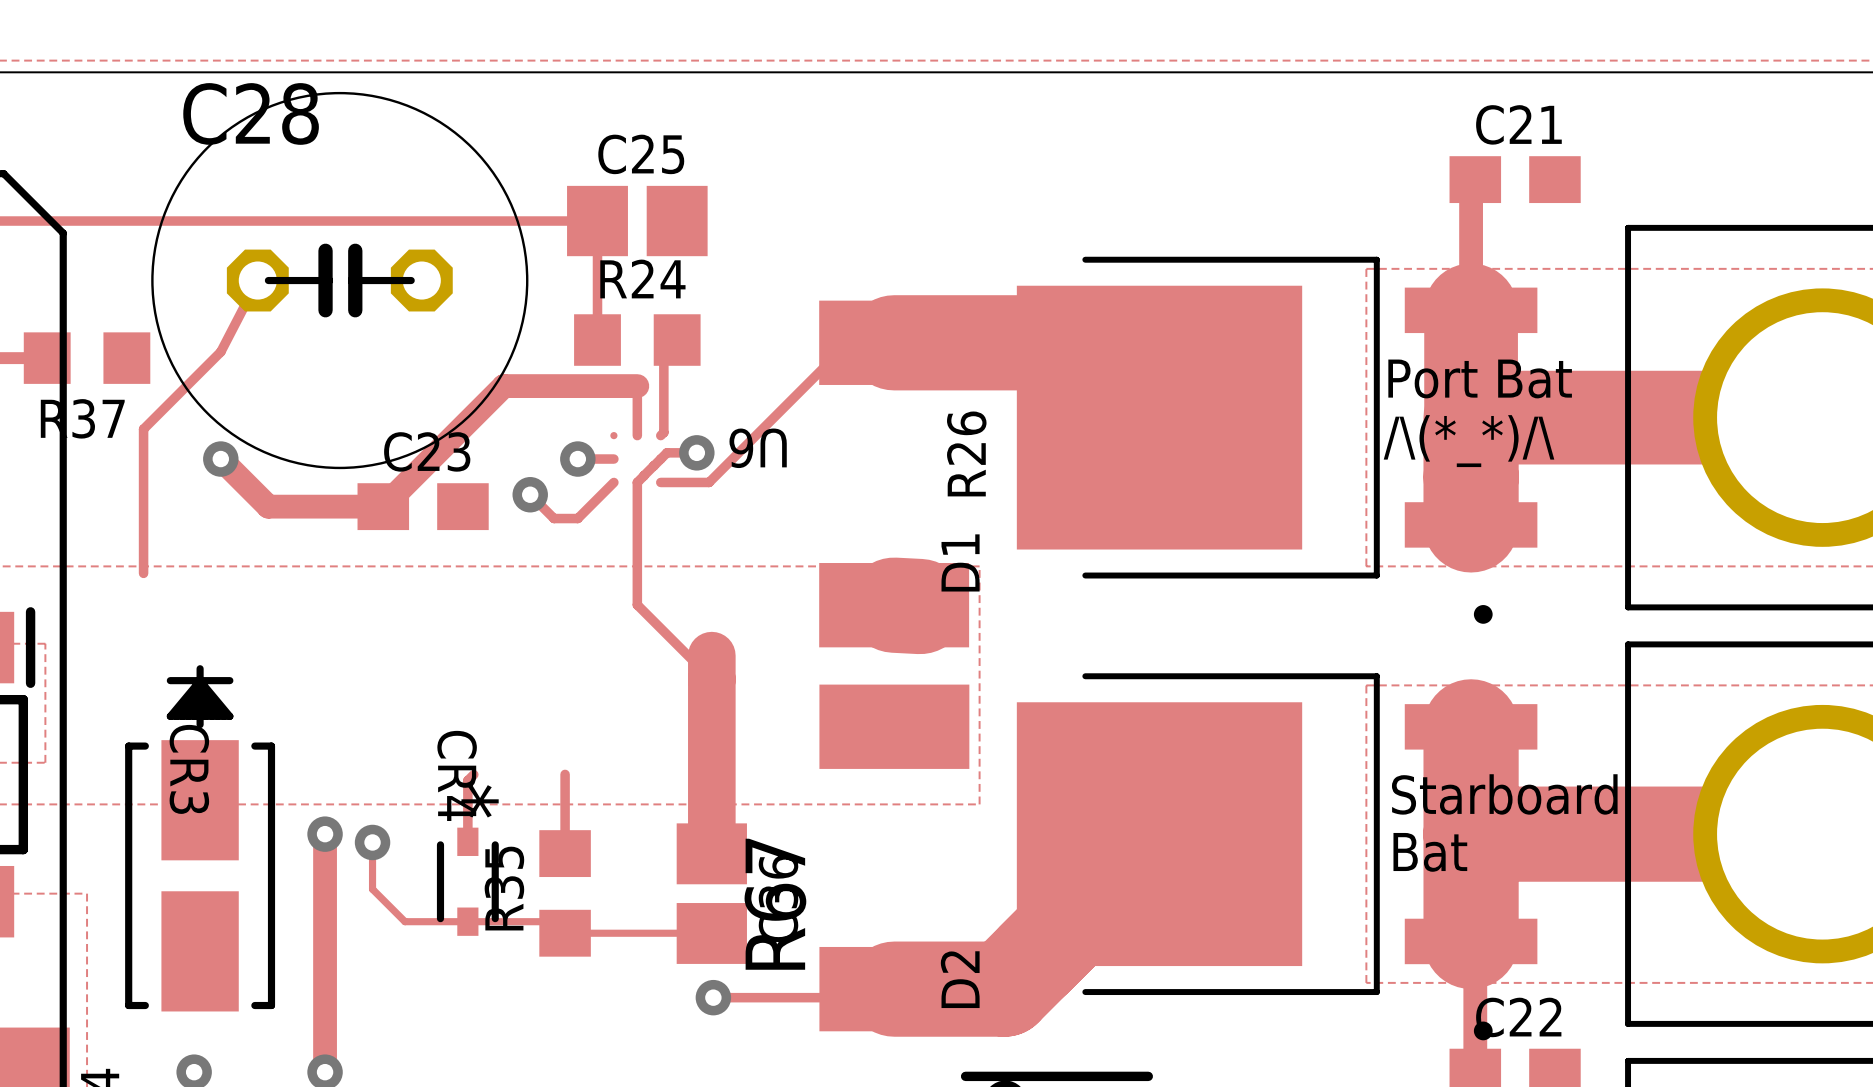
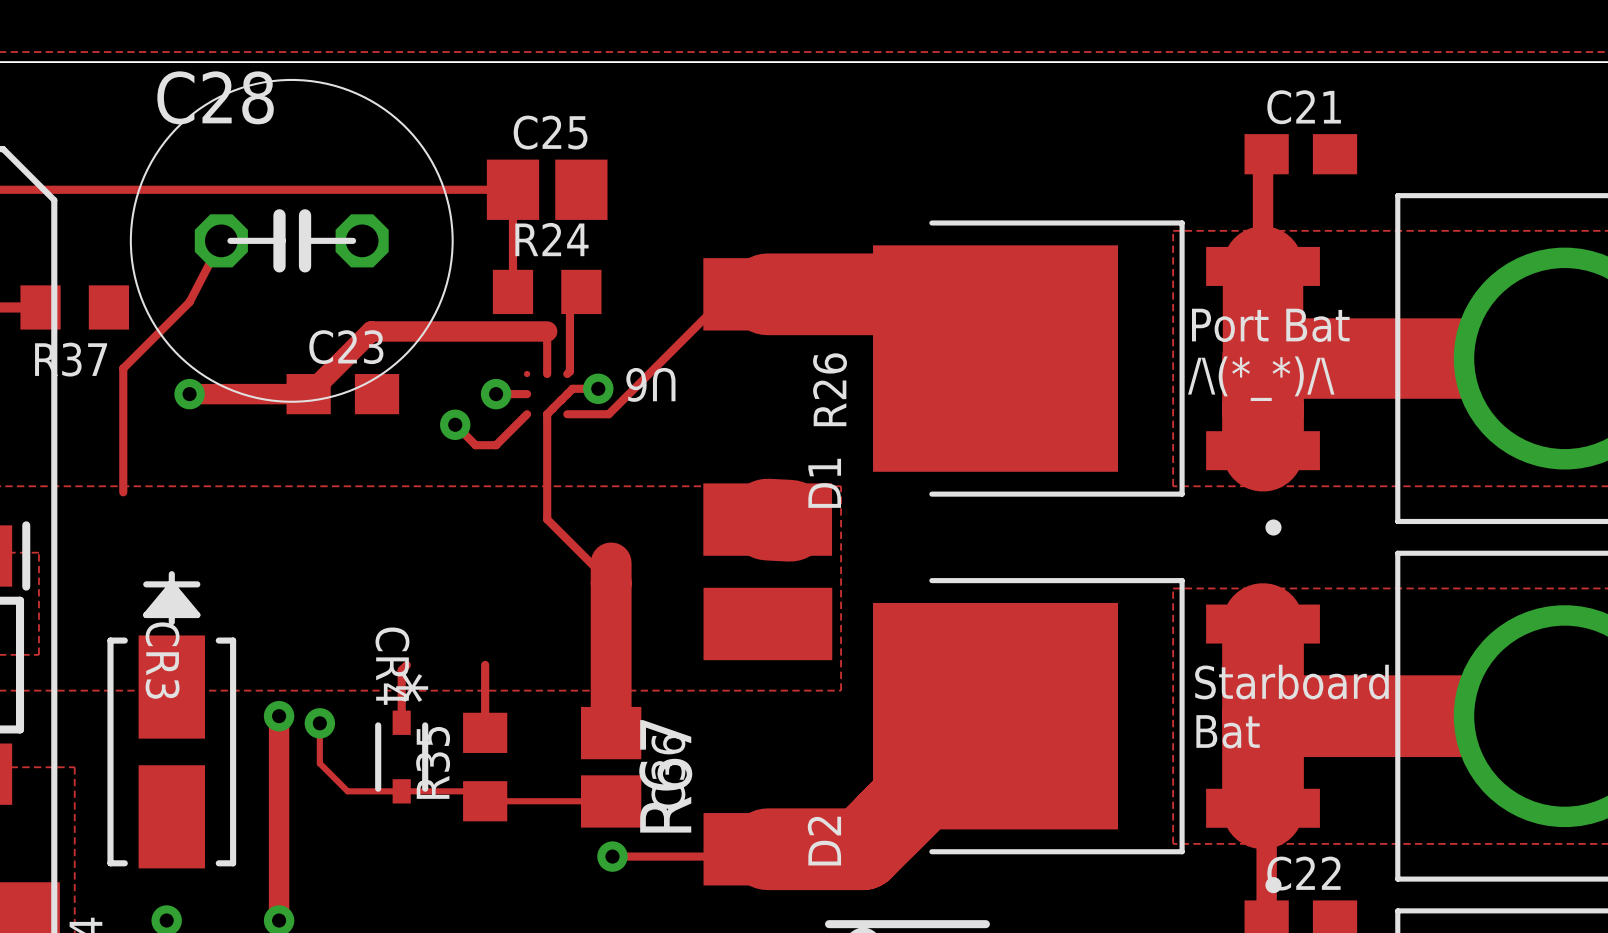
track: (503, 386) (383, 506) (268, 506) (220, 459) -> (432, 331) (371, 331) (308, 394) (189, 394)
C23 position: (423, 506) -> (342, 394)

